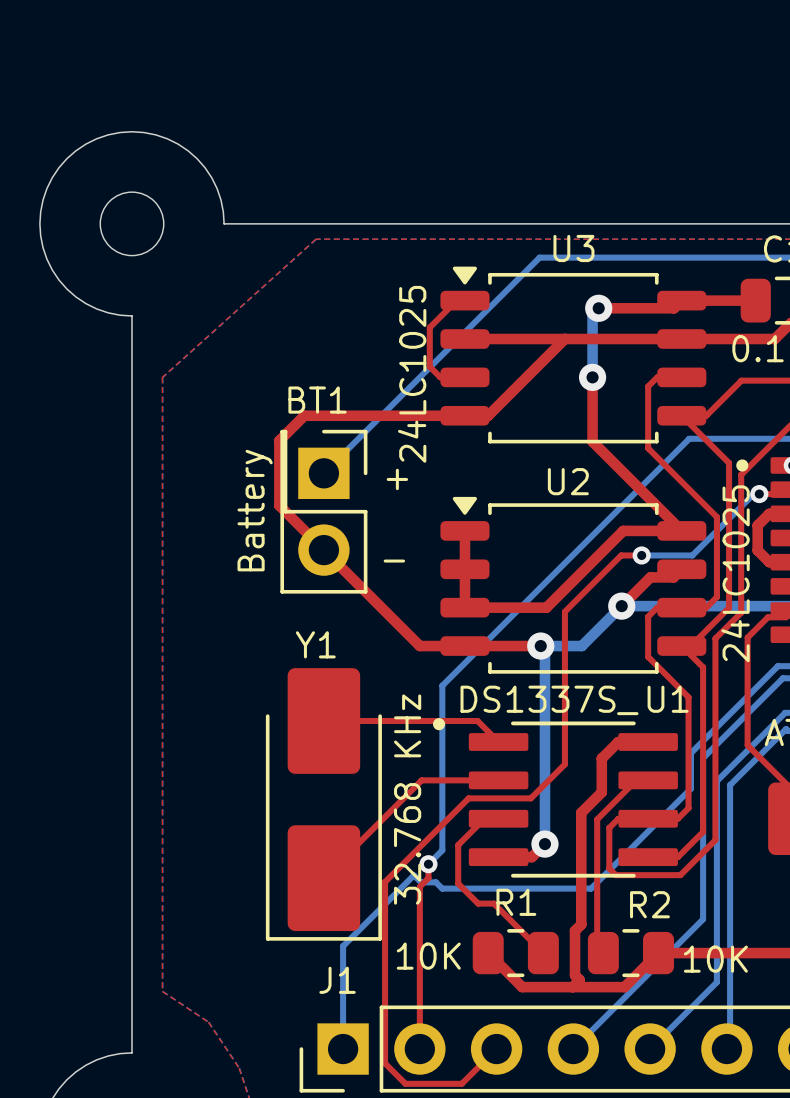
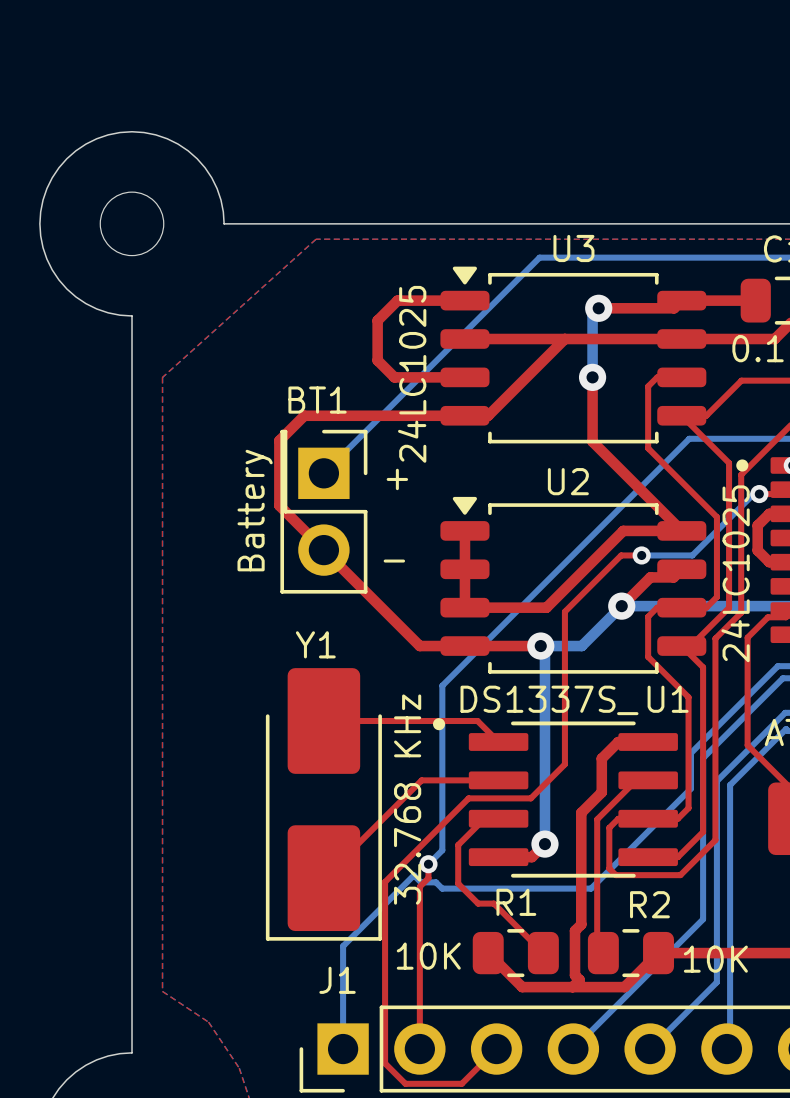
top track: (456, 300) (429, 327) (429, 366) (440, 377) -> (456, 300) (397, 300) (377, 320) (377, 360) (394, 377) (440, 377)

